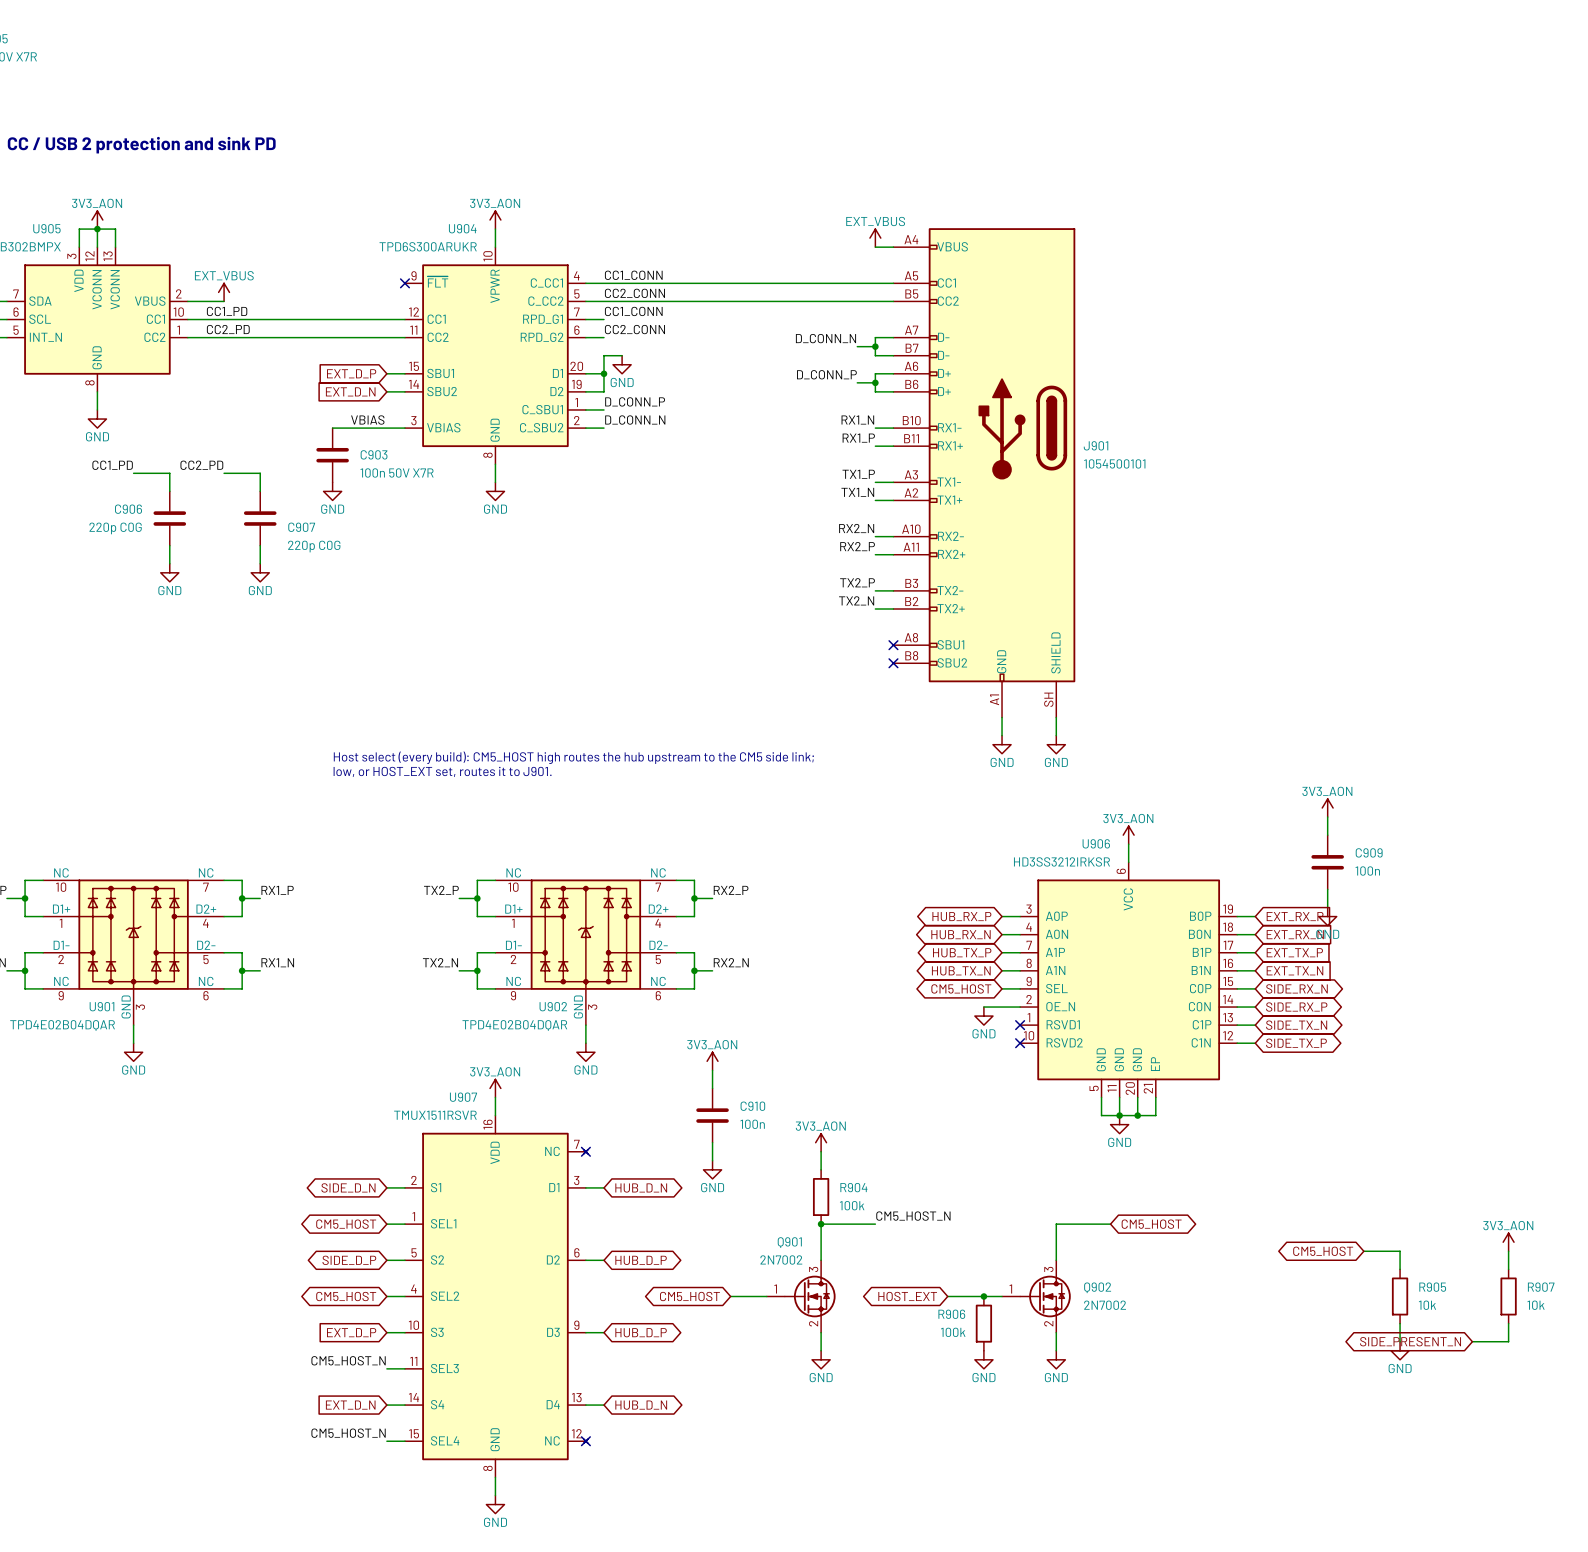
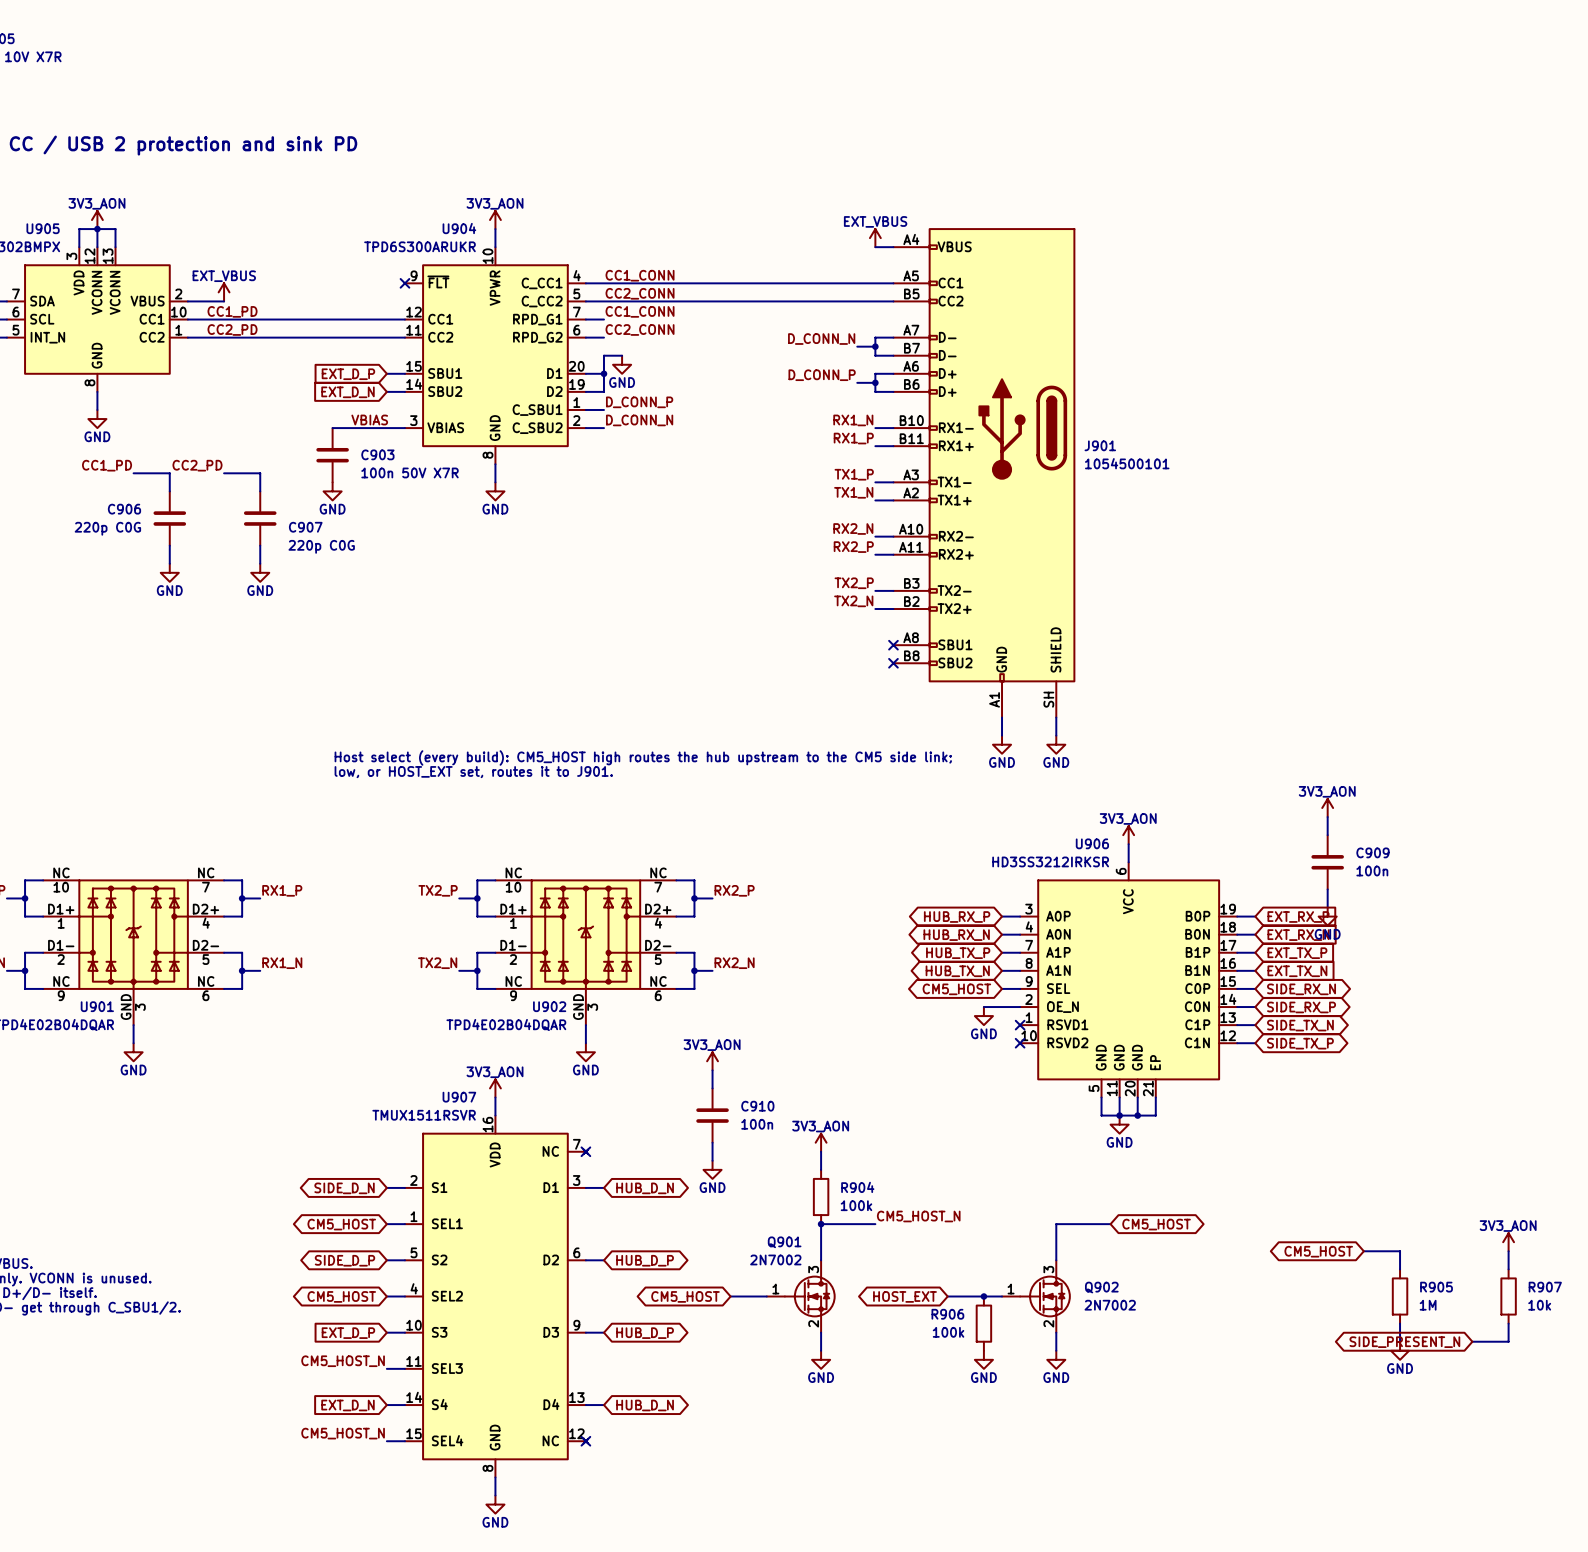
R905 value: 10k (1427, 1305) -> 1M (1428, 1305)

